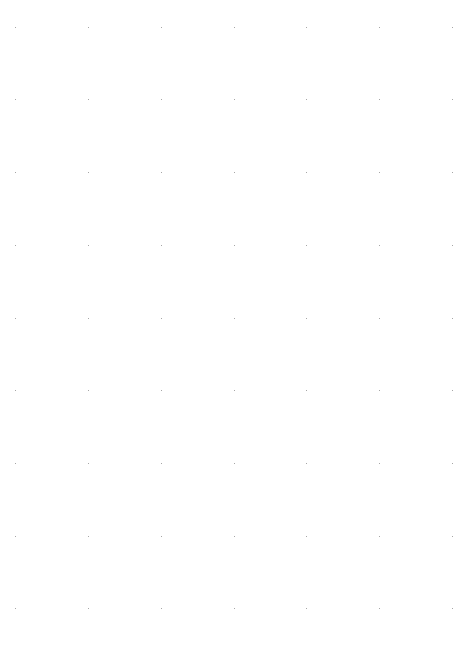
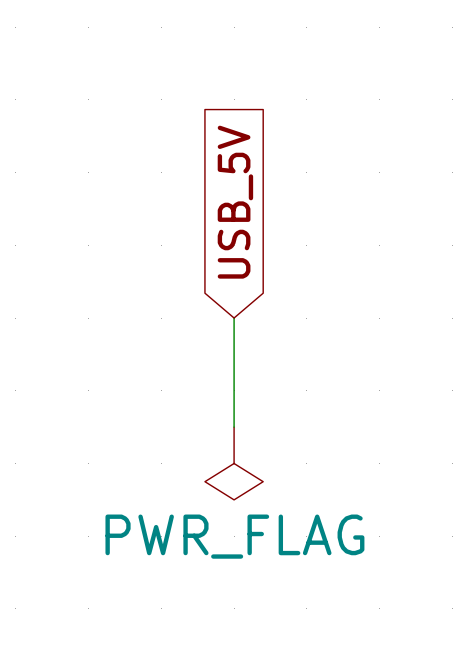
global label: none -> USB_5V (235, 202)
wire: none -> (234, 318) (234, 427)
power symbol: none -> PWR_FLAG (234, 463)

